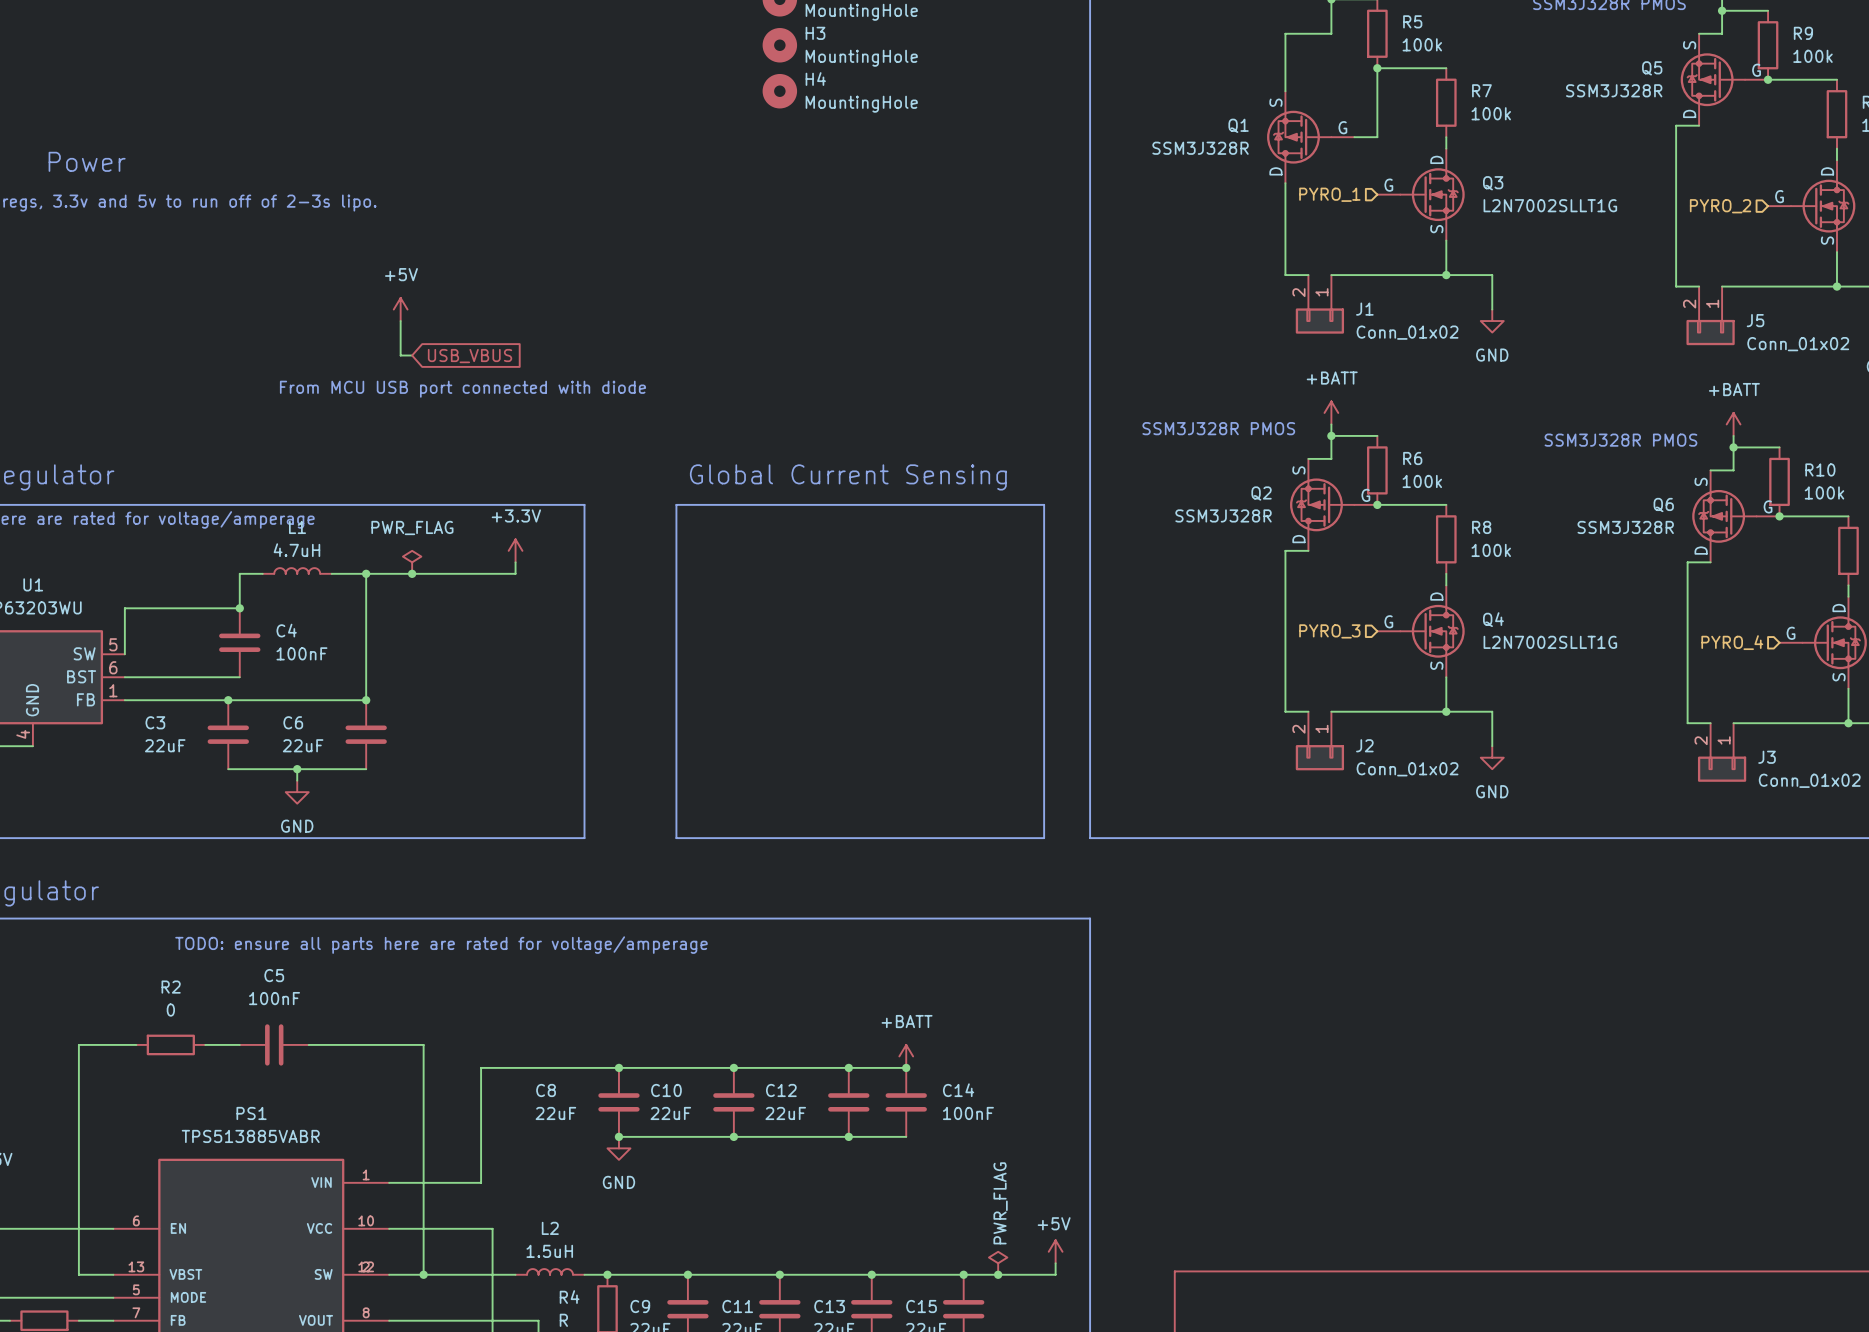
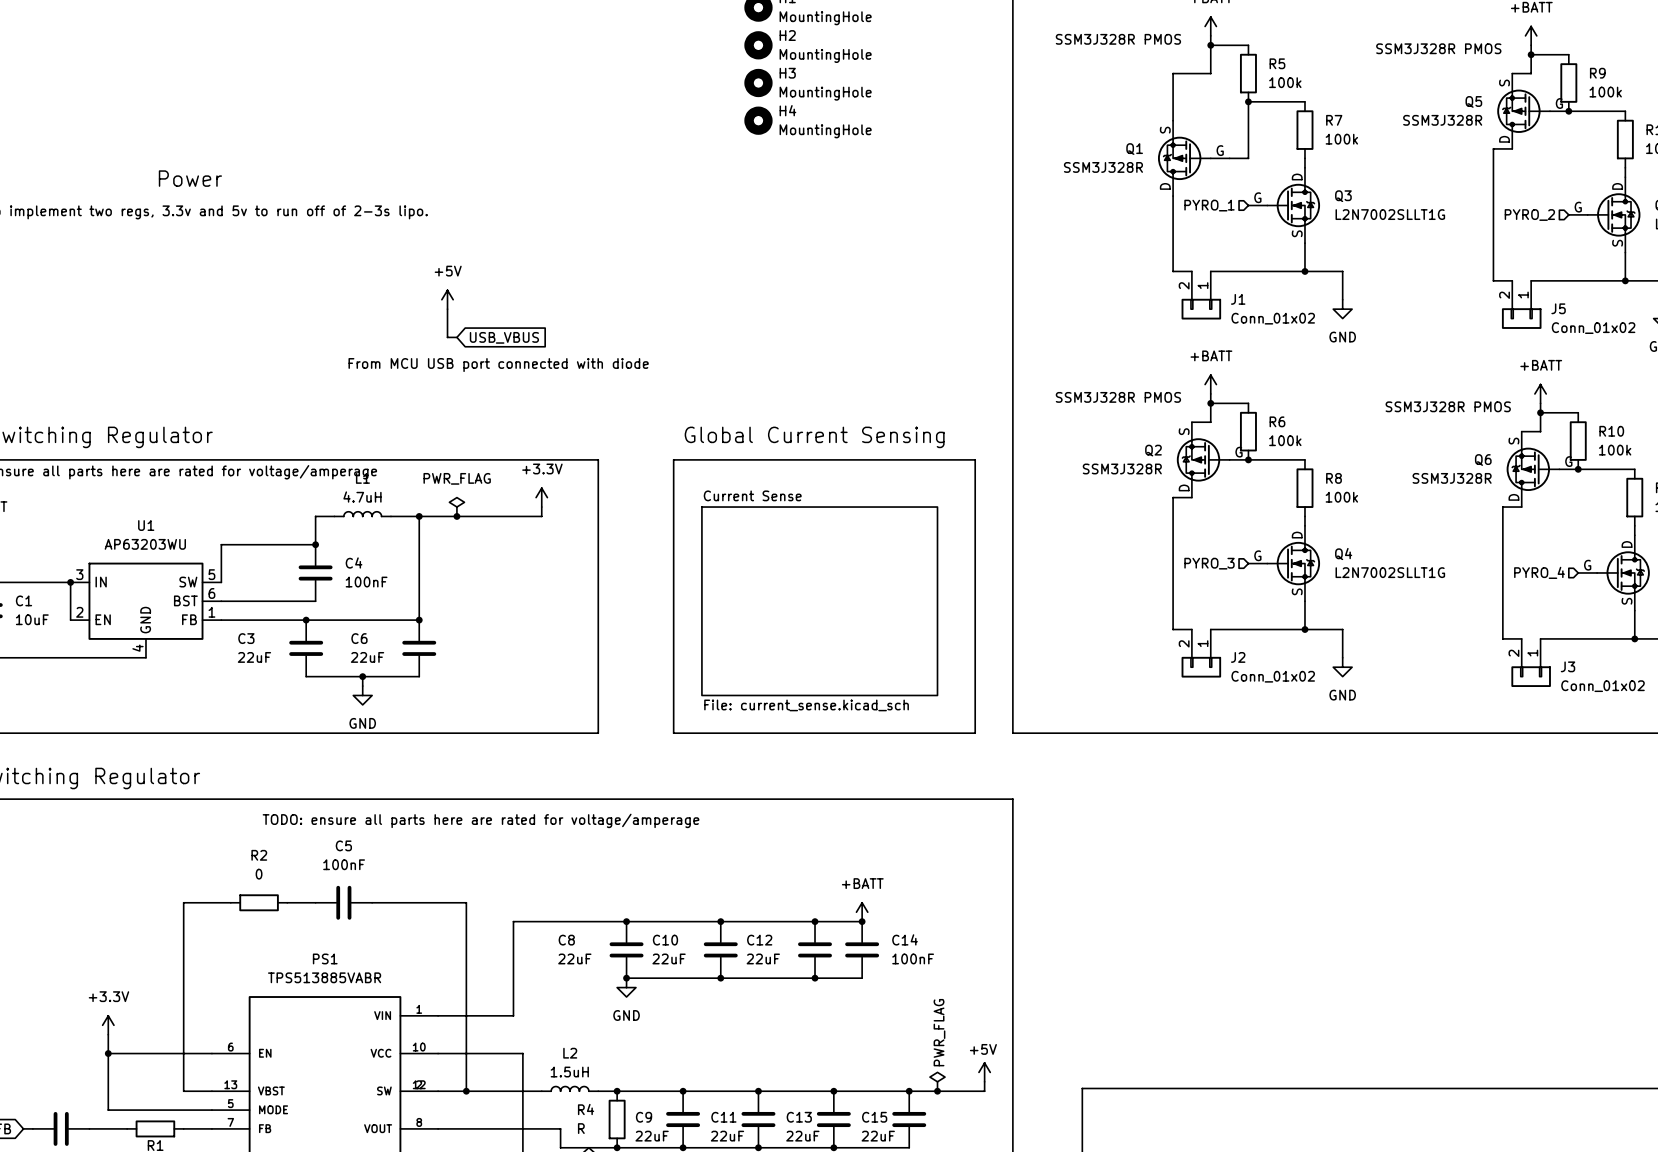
sheet Current Sense: none -> File: current_sense.kicad_sch (819, 601)

